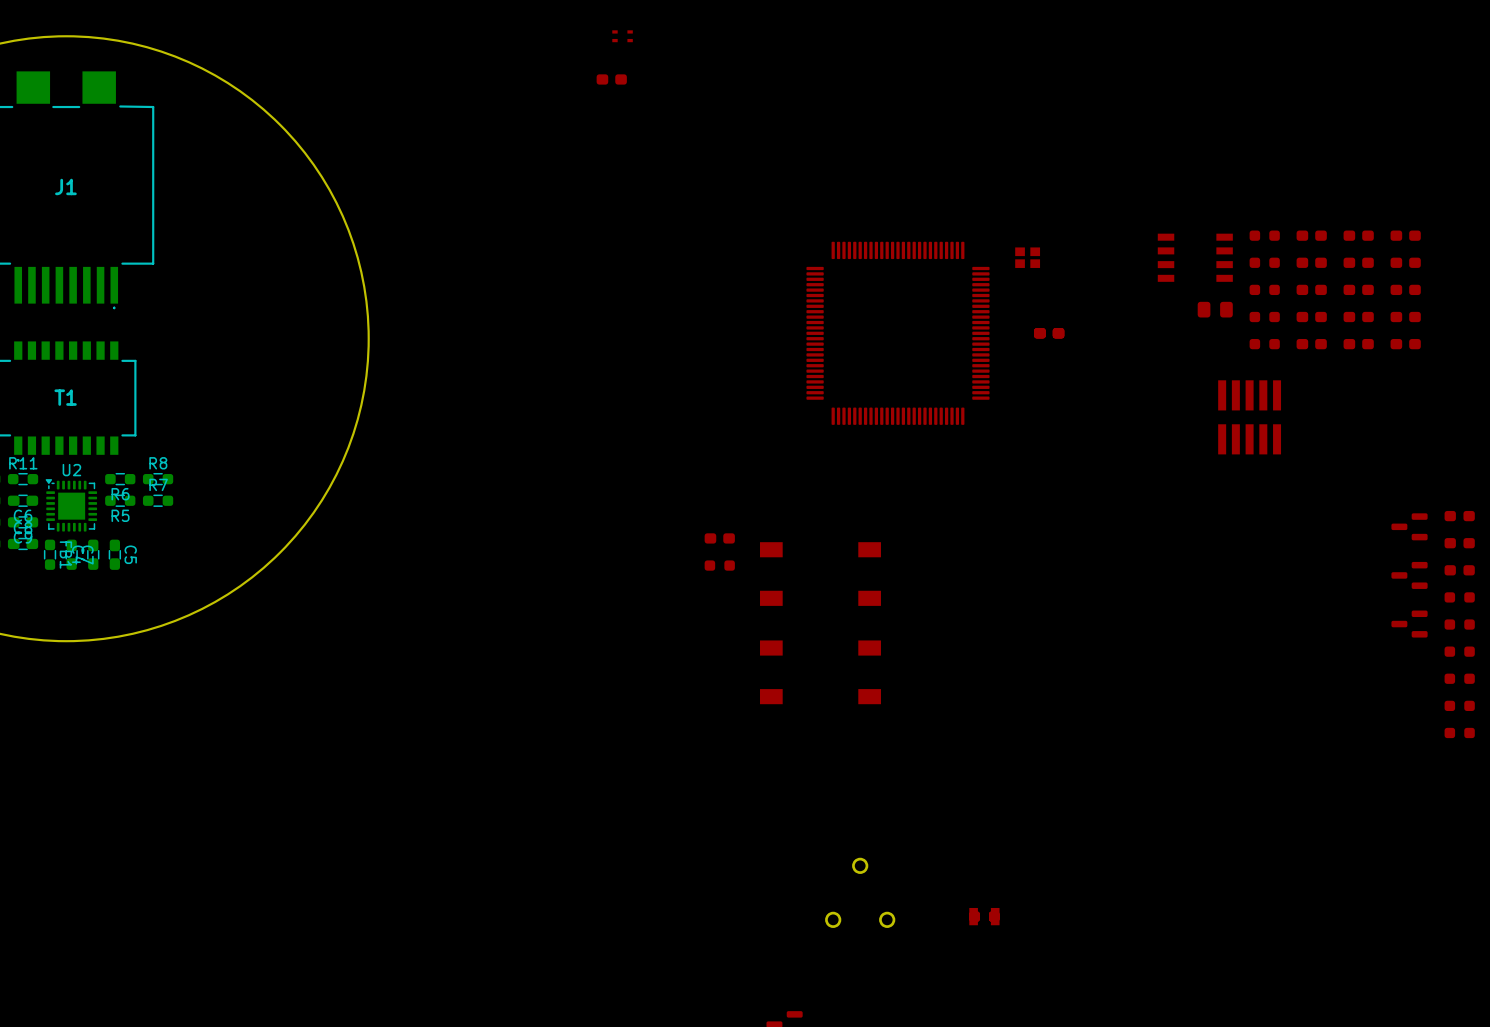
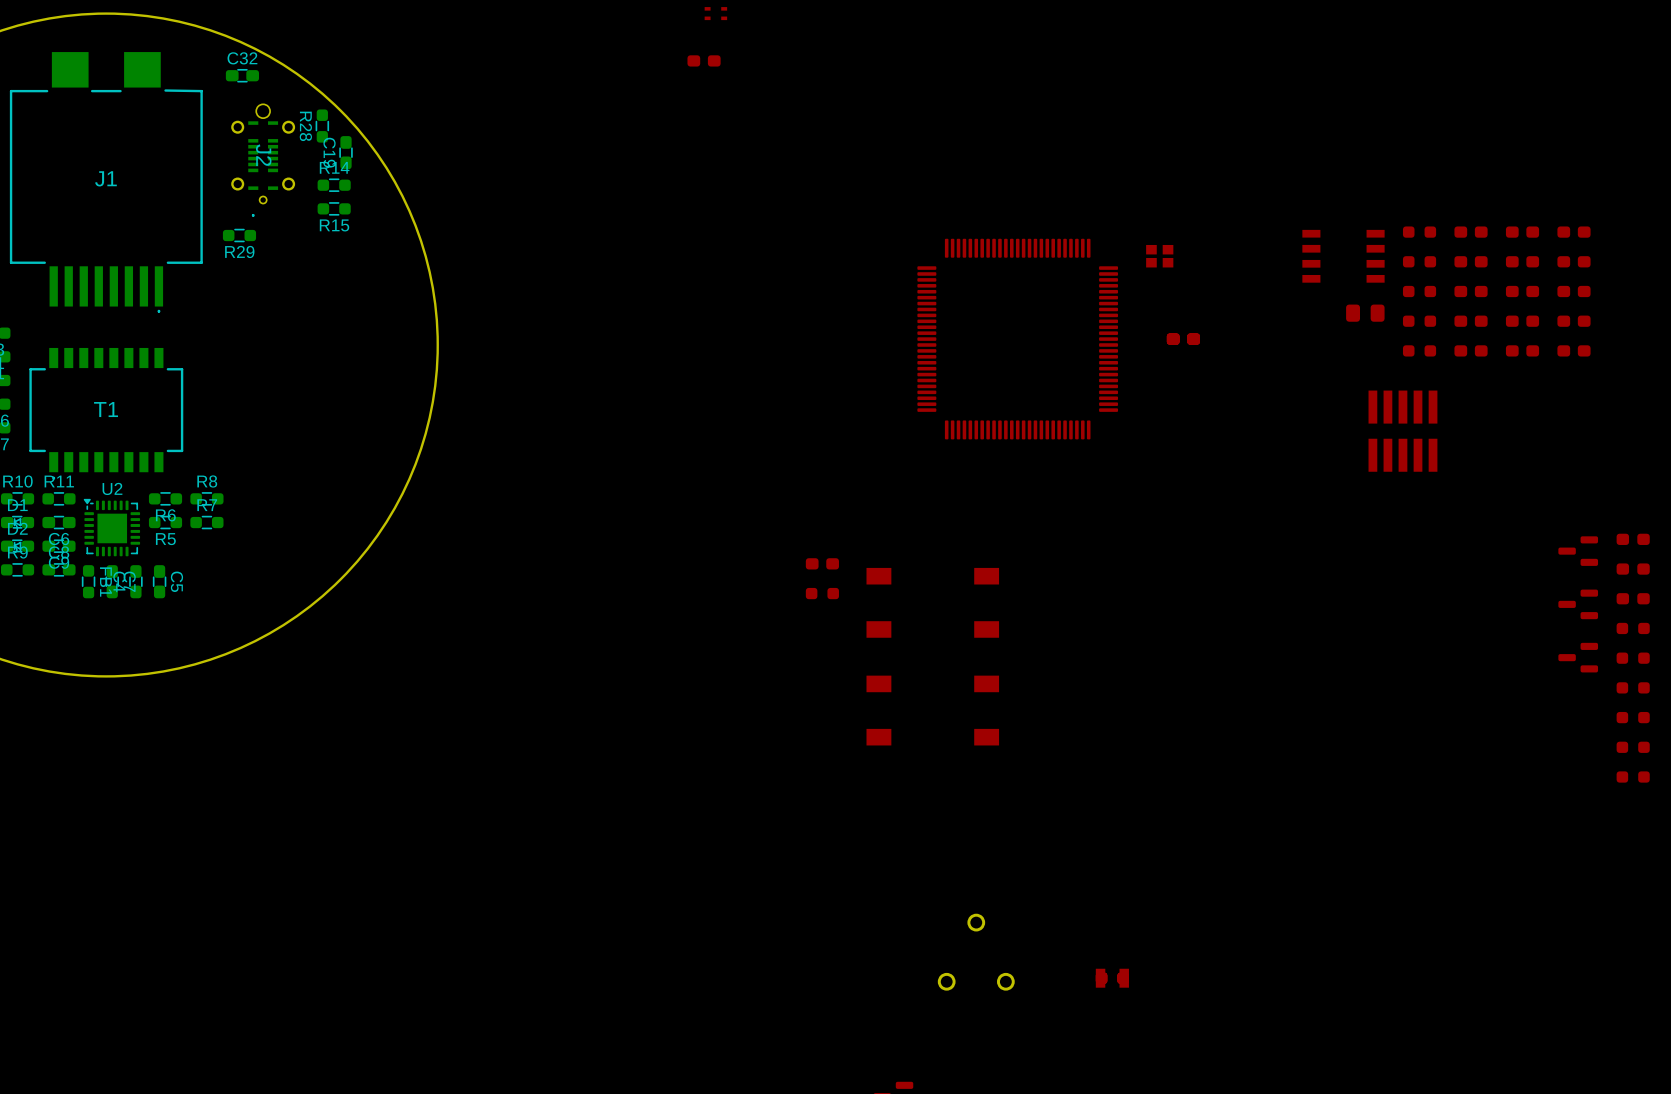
C32: none -> (242, 75)
R28: none -> (322, 126)
C19: none -> (346, 152)
J2: none -> (263, 160)
R14: none -> (334, 185)
R15: none -> (334, 208)
R29: none -> (239, 235)

